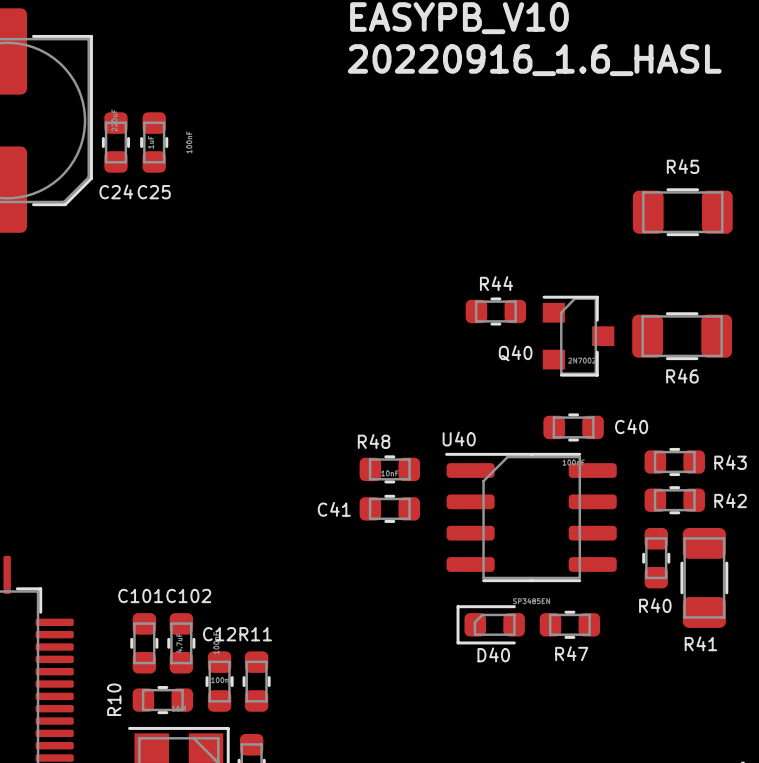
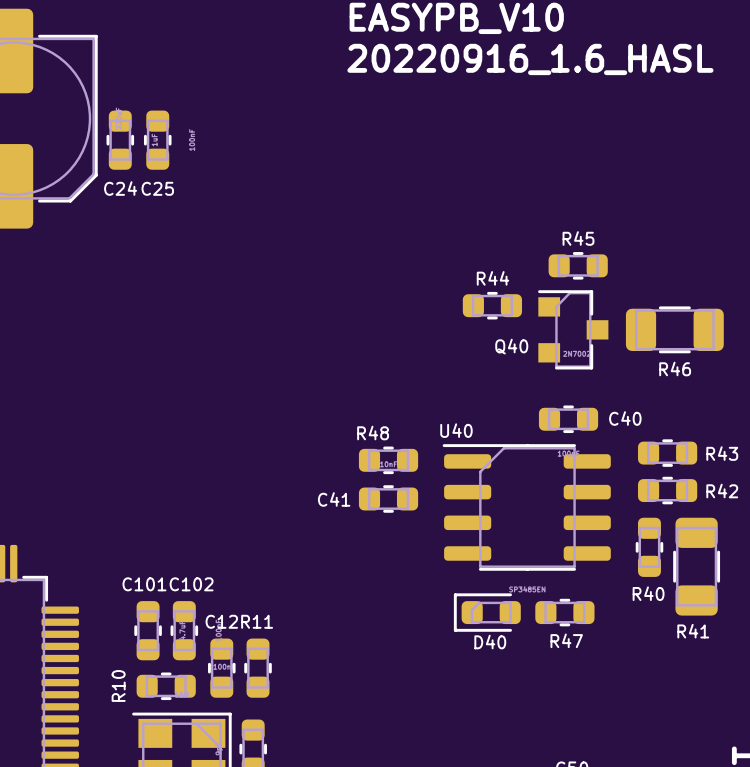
R45 footprint: [632, 188, 733, 237] -> [548, 252, 608, 280]

